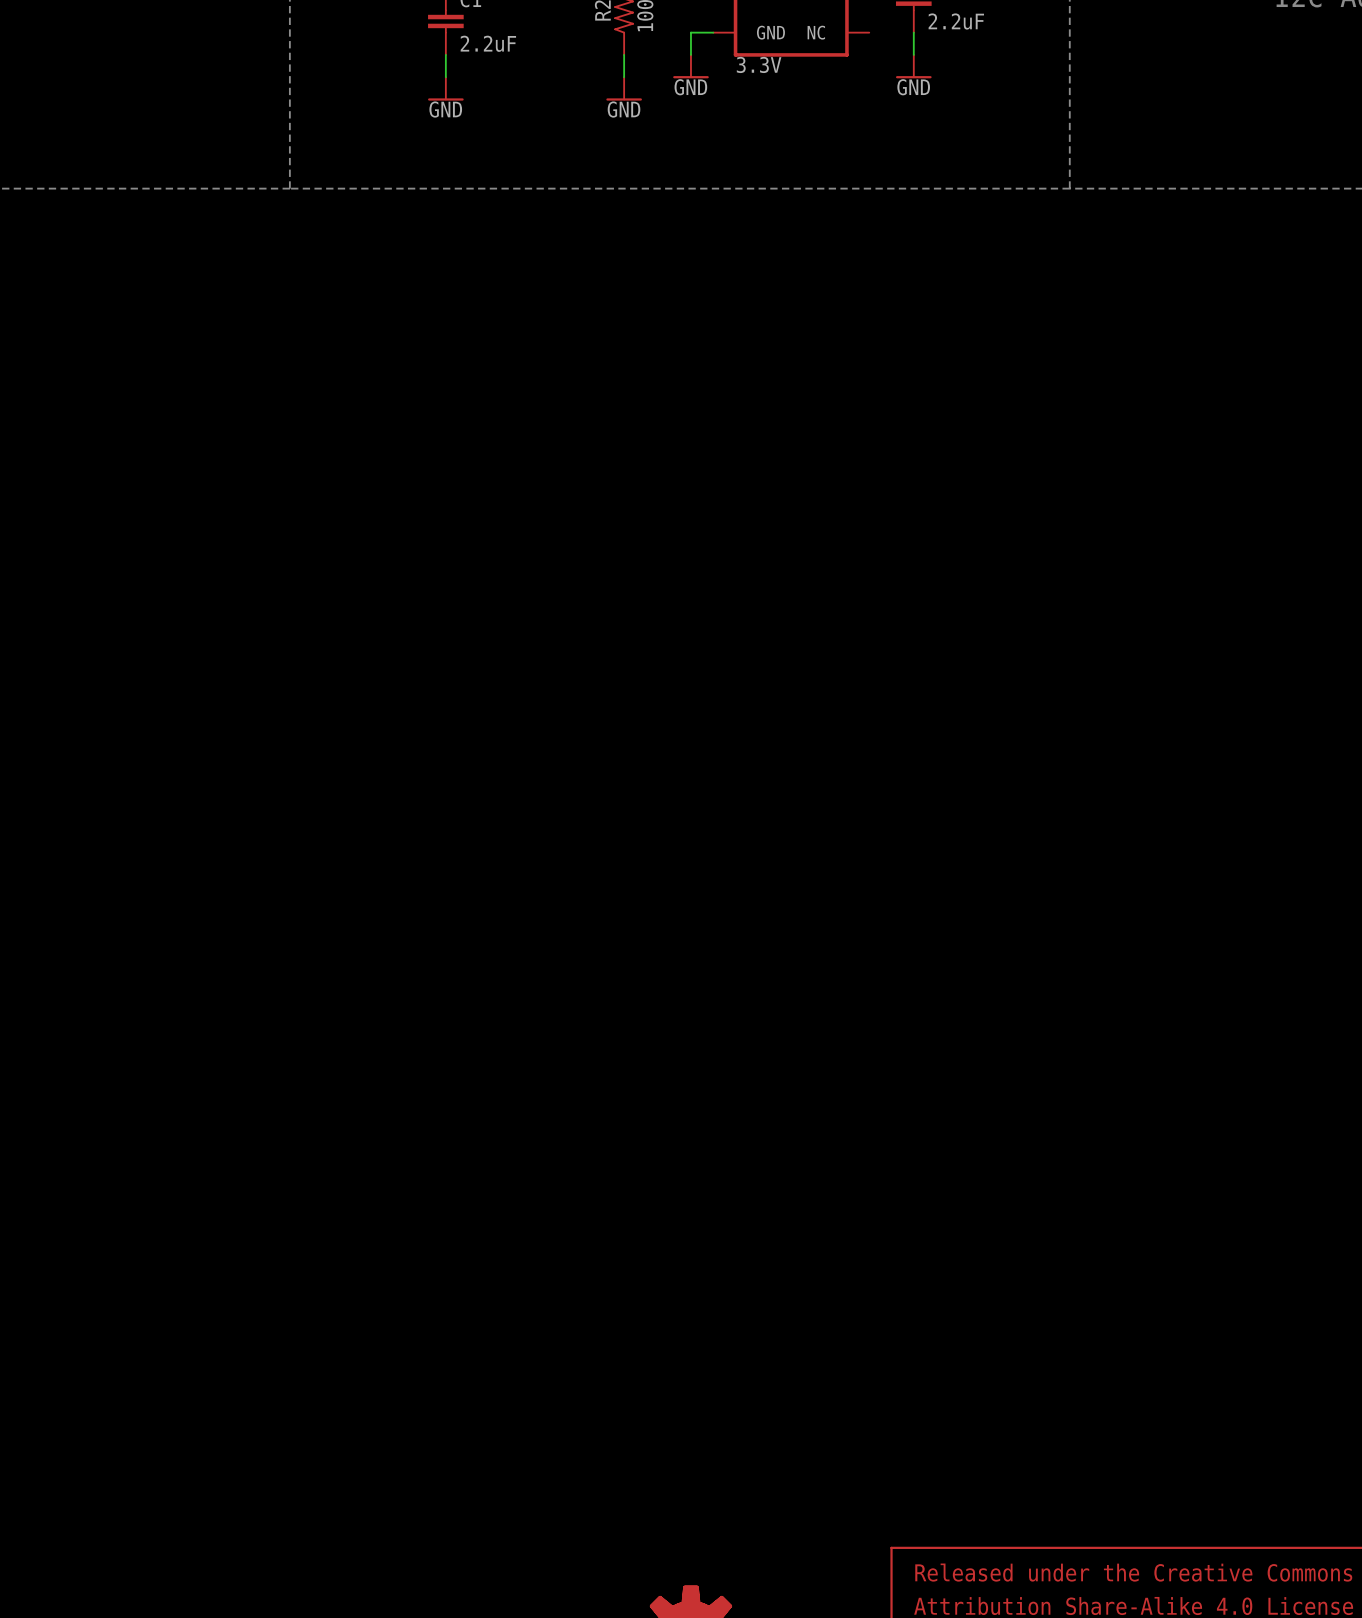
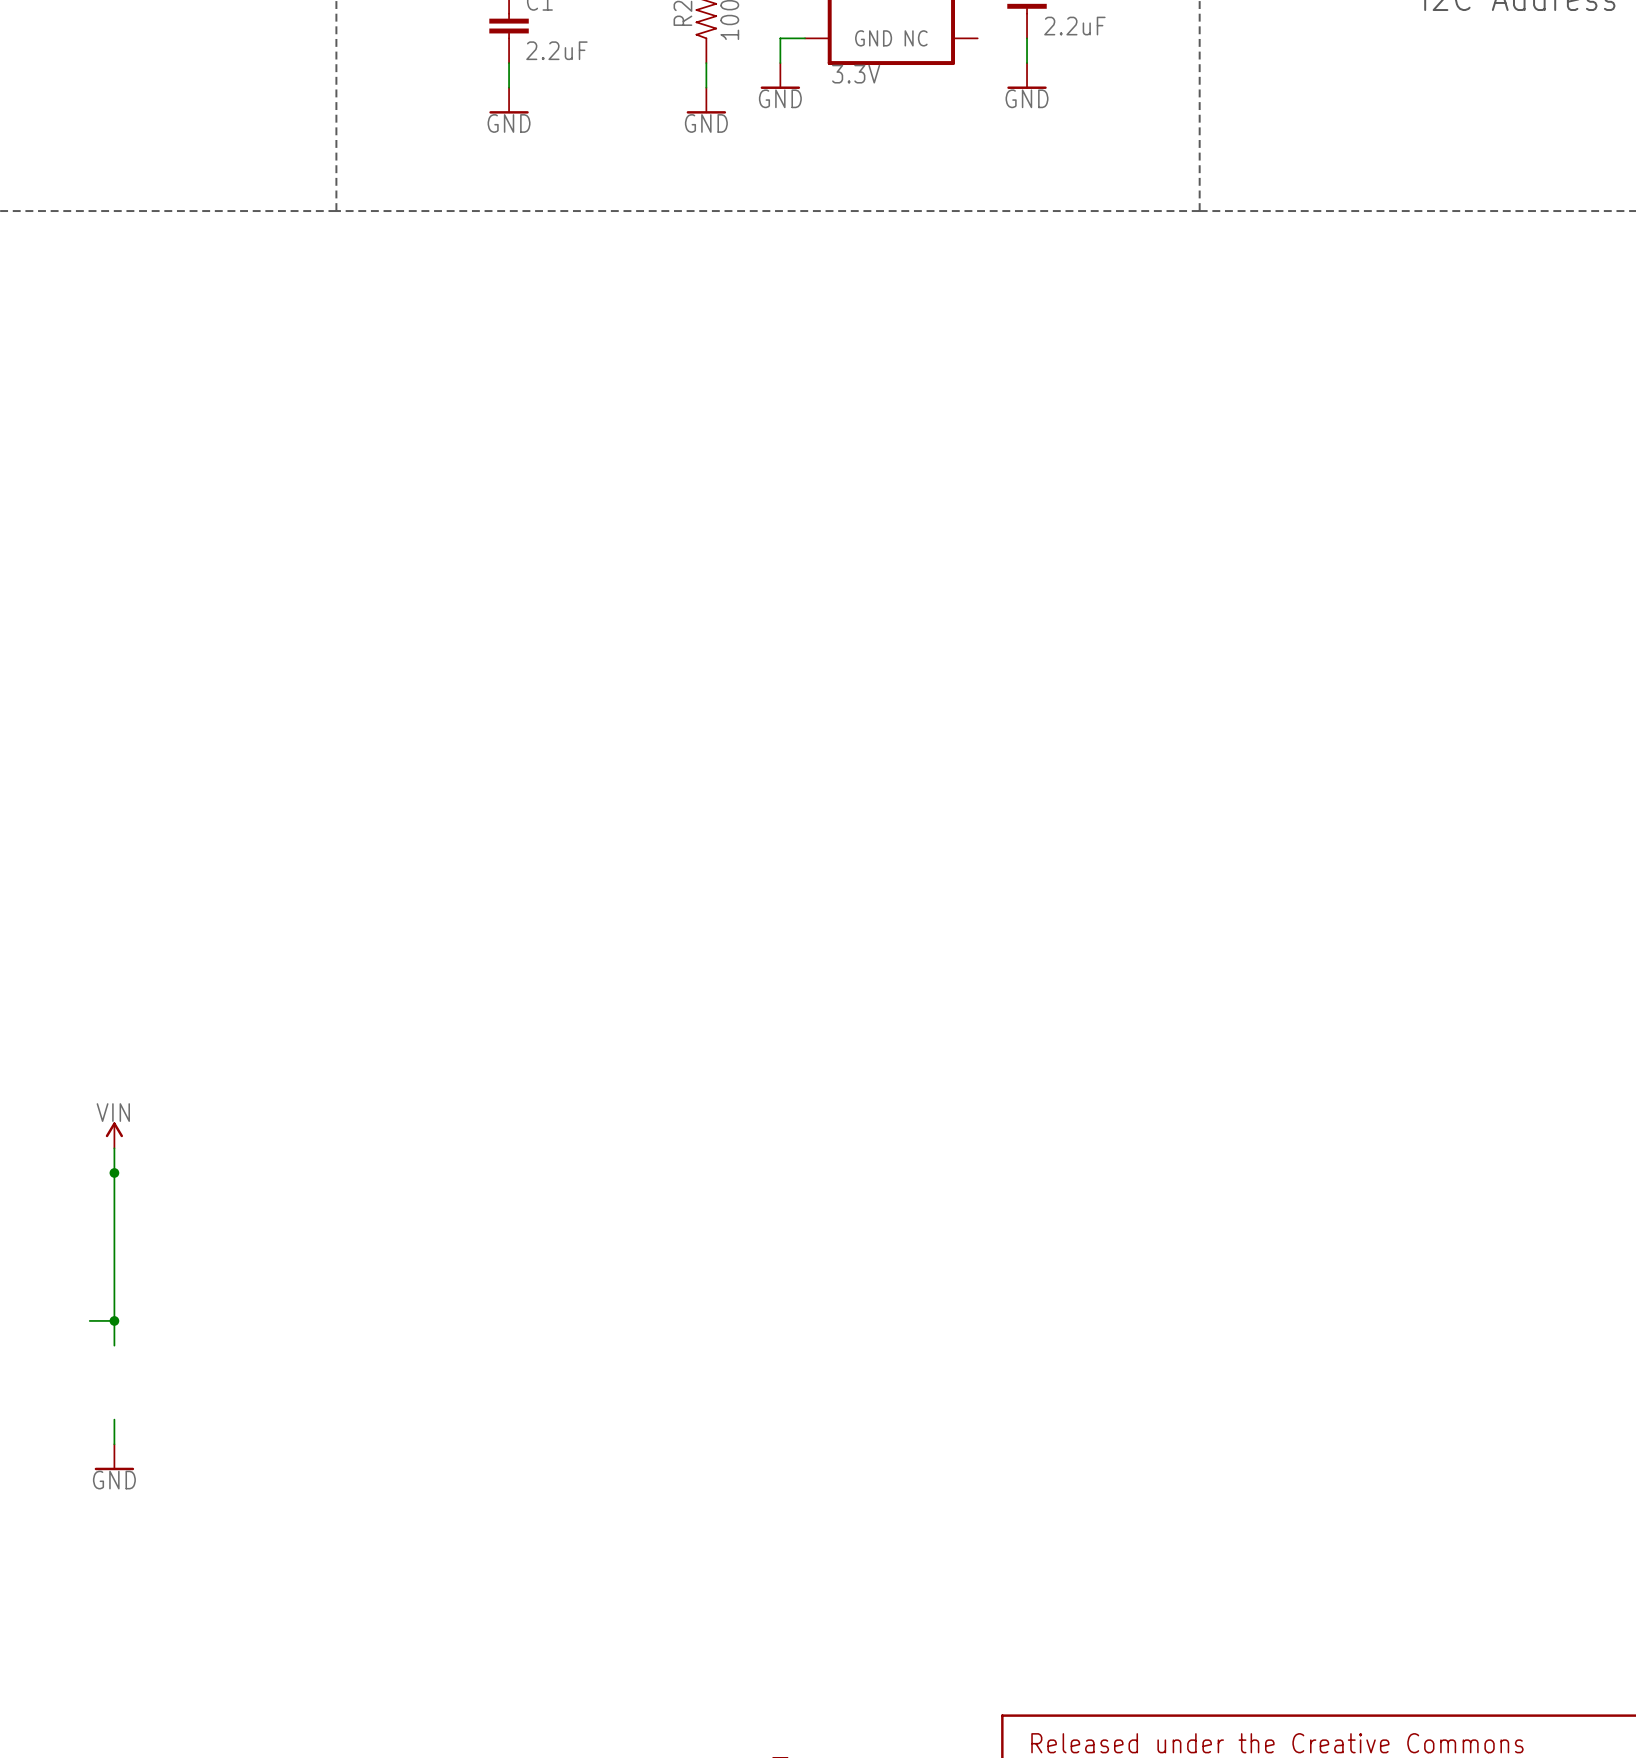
power symbol: none -> VIN (114, 1135)
wire: none -> (114, 1148) (114, 1345)
junction: none -> (114, 1172)
wire: none -> (89, 1320) (114, 1320)
junction: none -> (114, 1320)
wire: none -> (114, 1419) (114, 1444)
power symbol: none -> GND (114, 1457)

